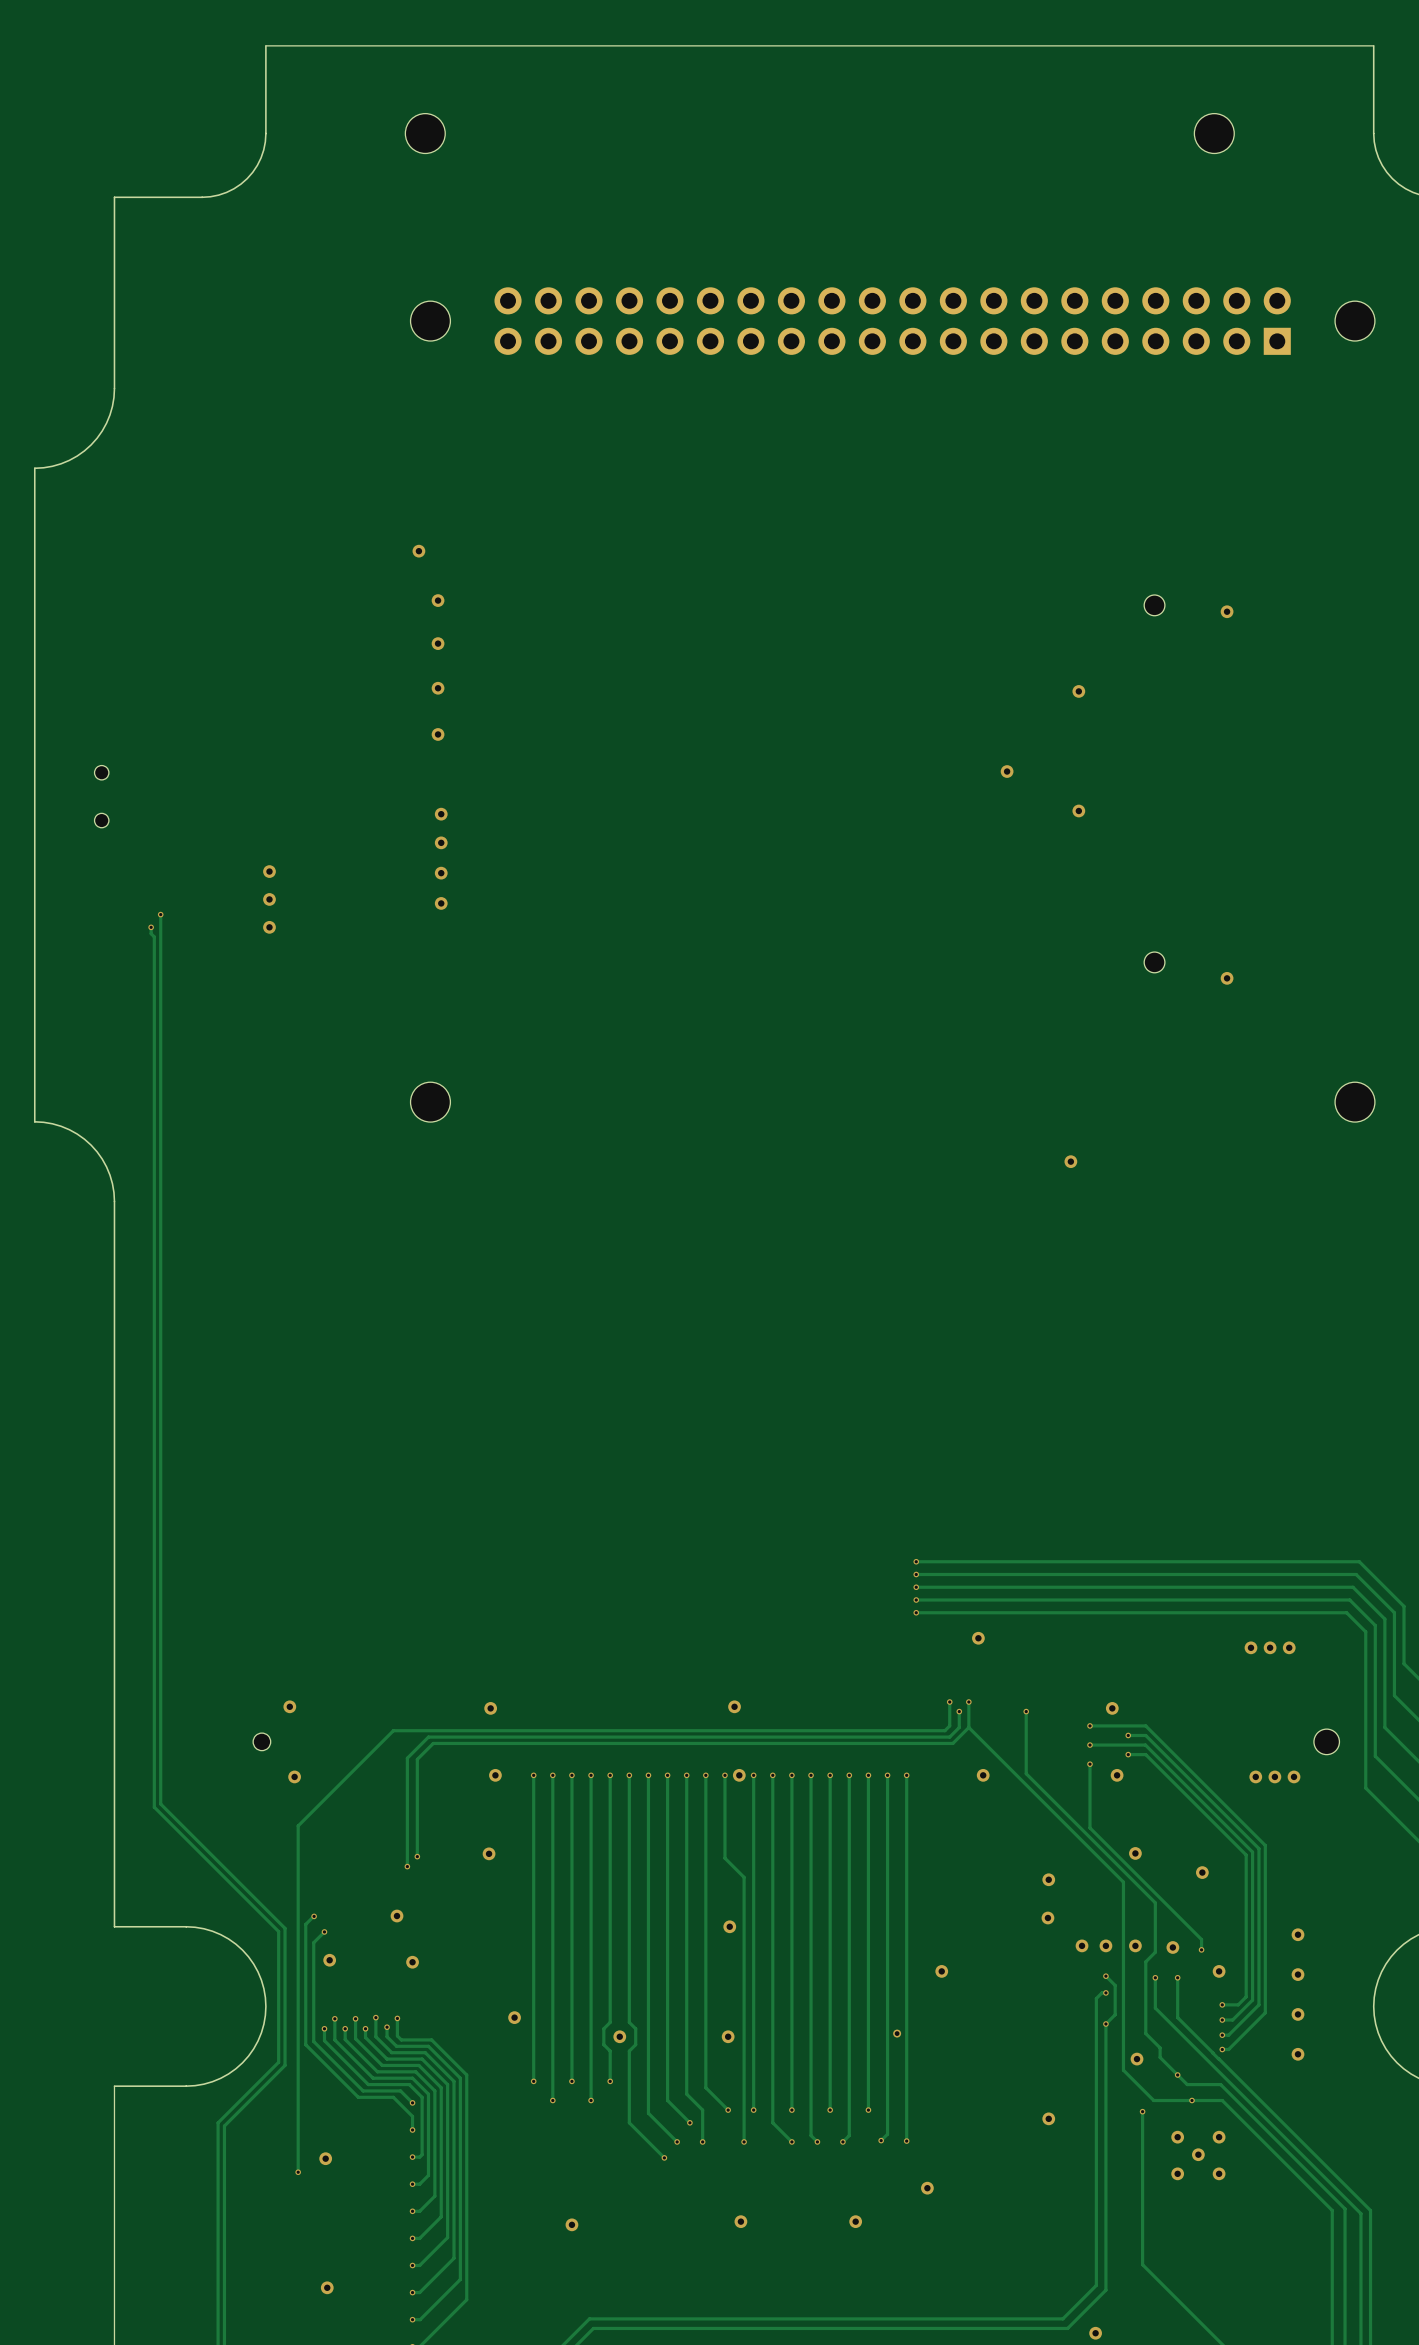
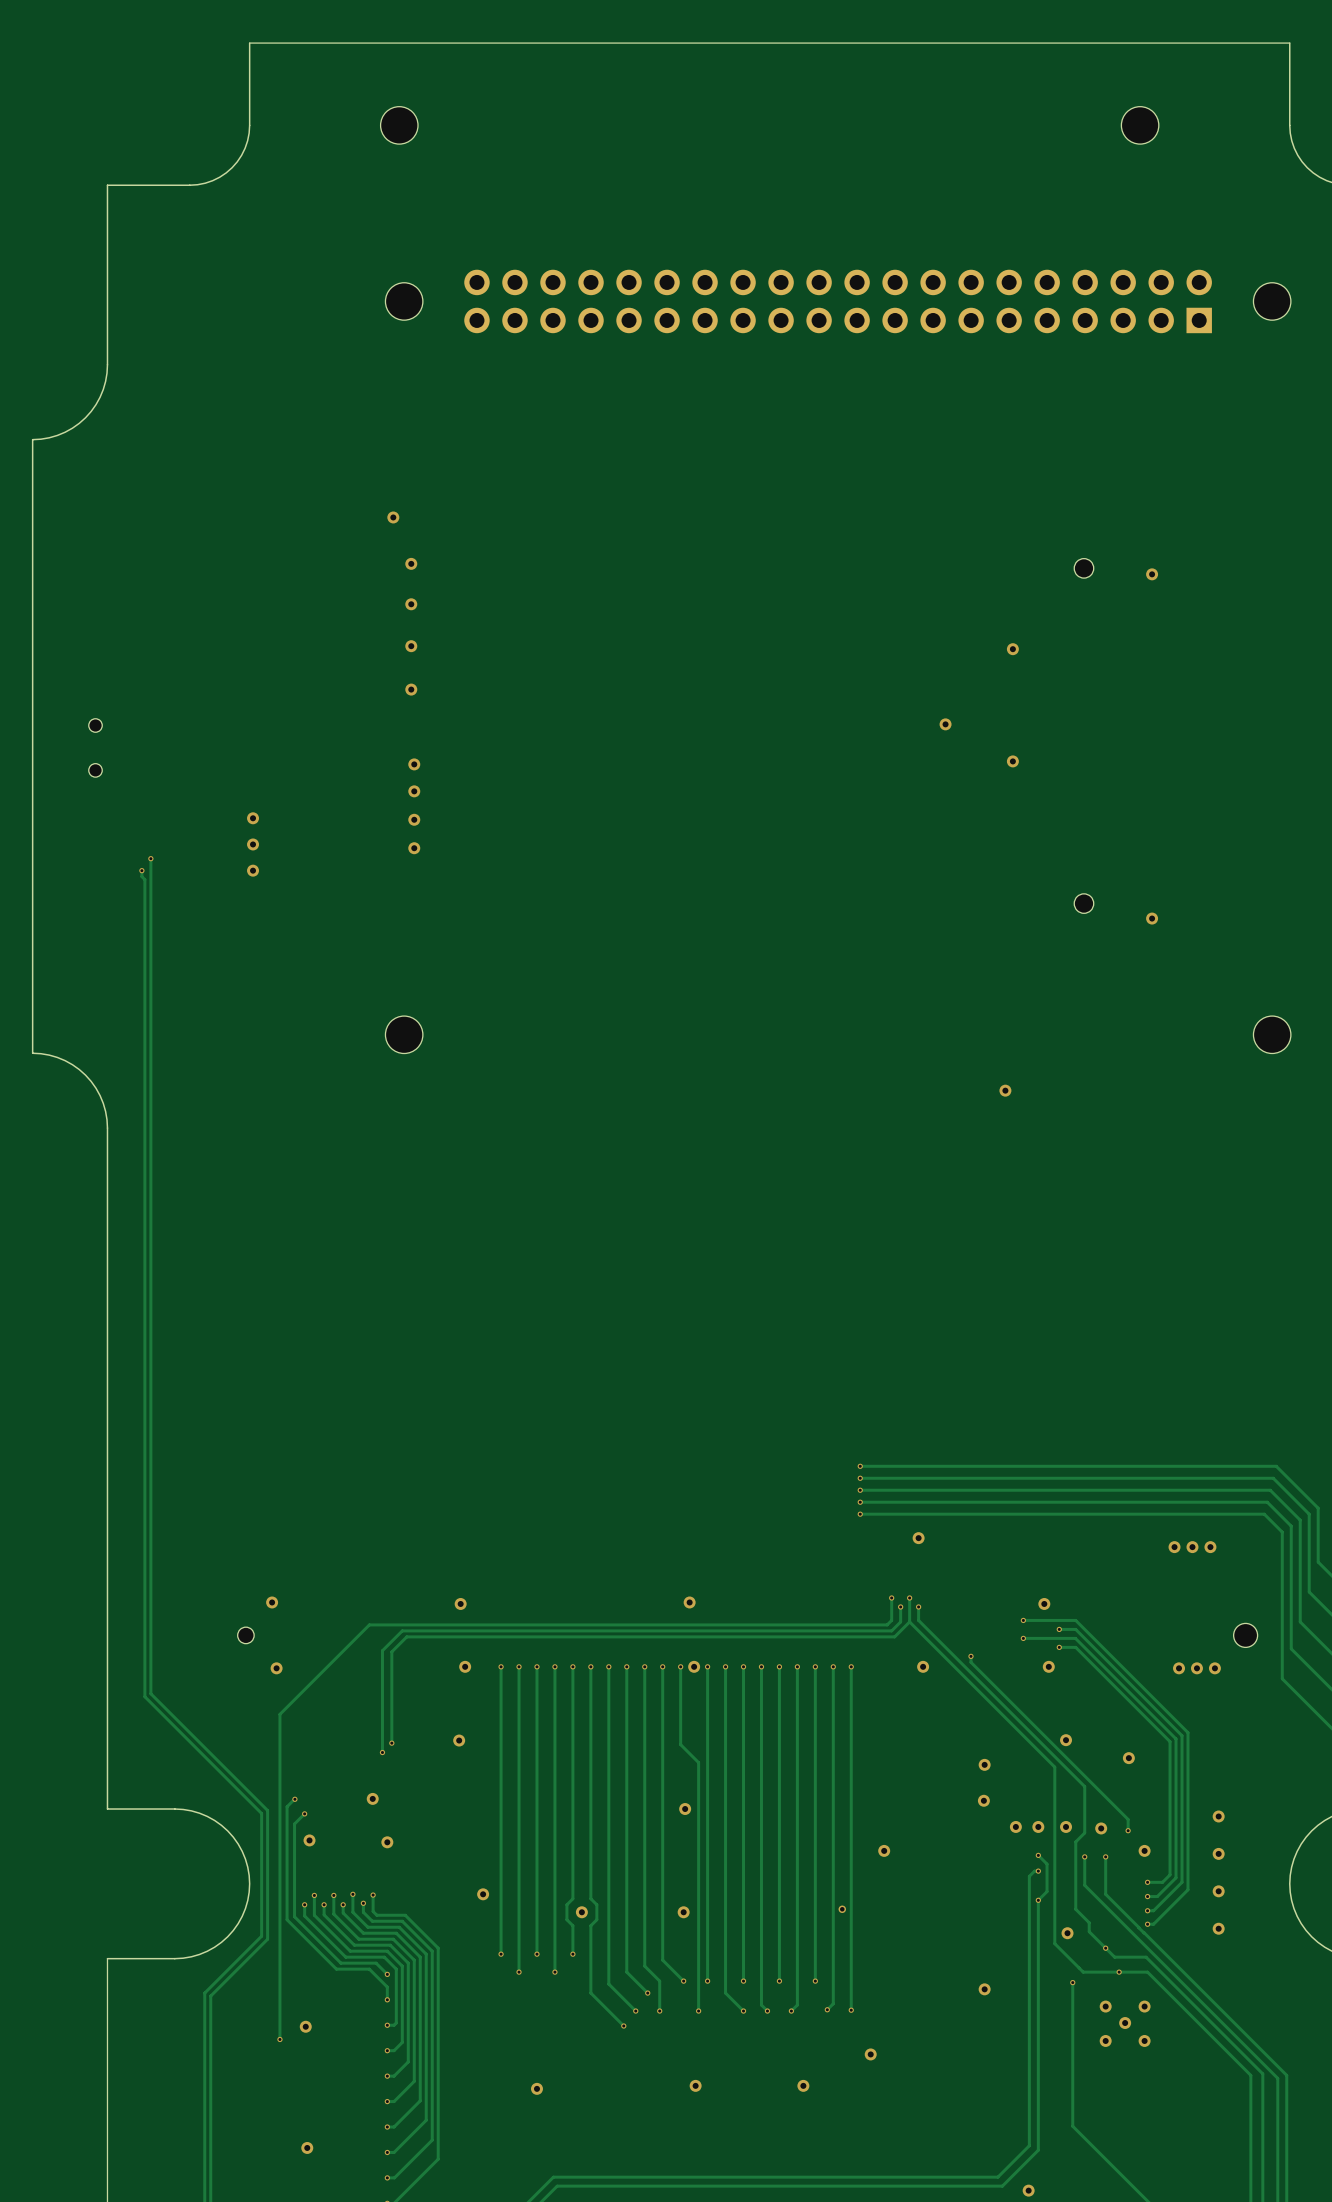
via: none -> (918, 1606)
track: (1026, 1711) (1026, 1773) -> (918, 1606) (918, 1620) (963, 1665)
via: (1026, 1711) -> none
via: none -> (970, 1656)
track: (1089, 1764) (1089, 1827) (1201, 1939) -> (970, 1656) (970, 1662) (1128, 1820)
via: (1089, 1764) -> none

